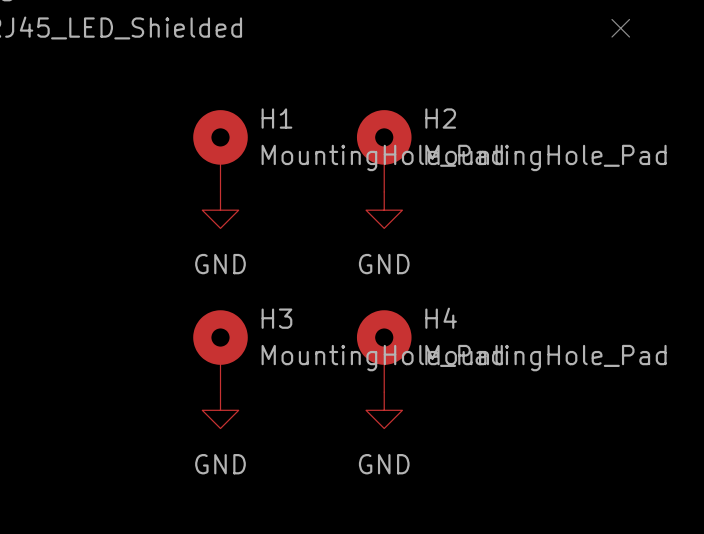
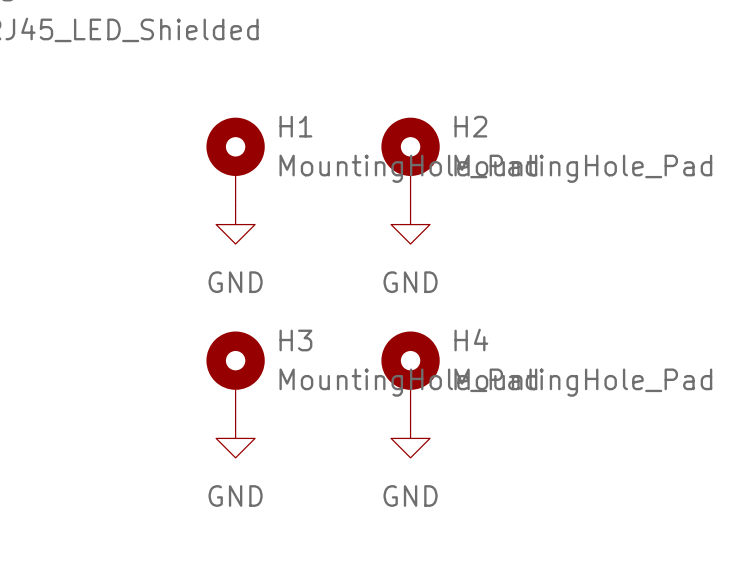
no-connect mark: (620, 28) -> none

